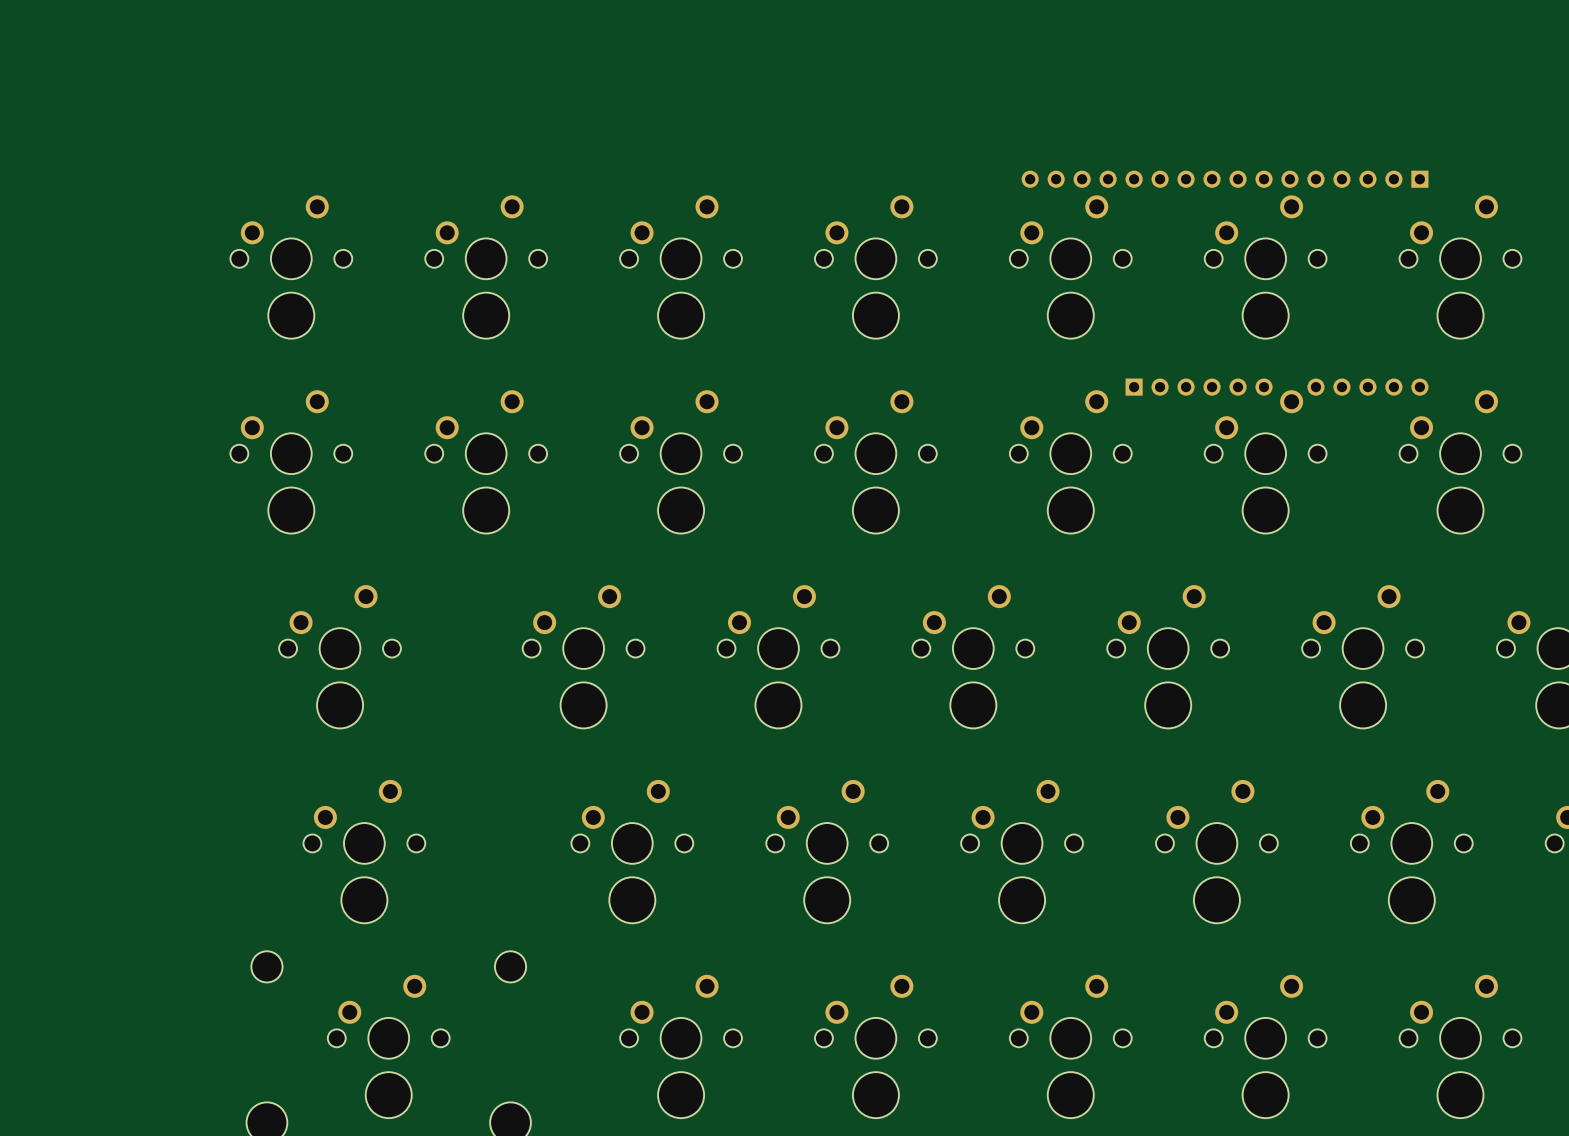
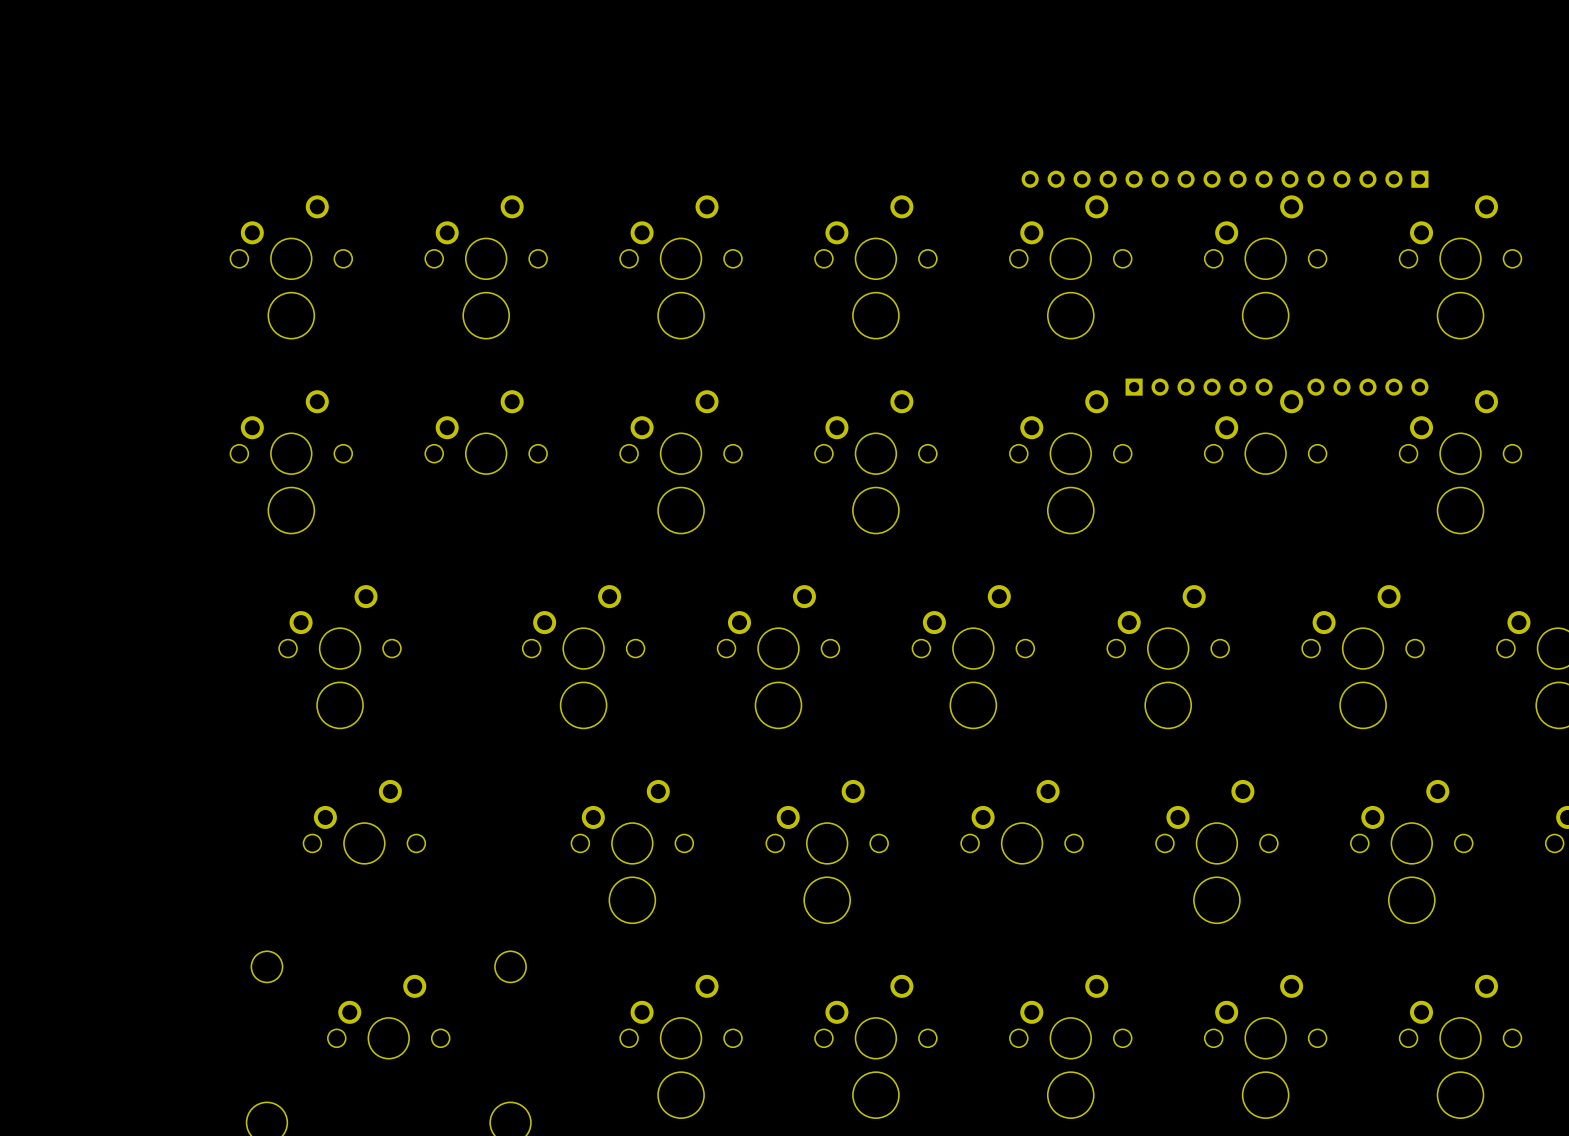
part: (486, 510) -> none
part: (1265, 510) -> none
part: (364, 900) -> none
part: (1022, 900) -> none
part: (388, 1095) -> none

